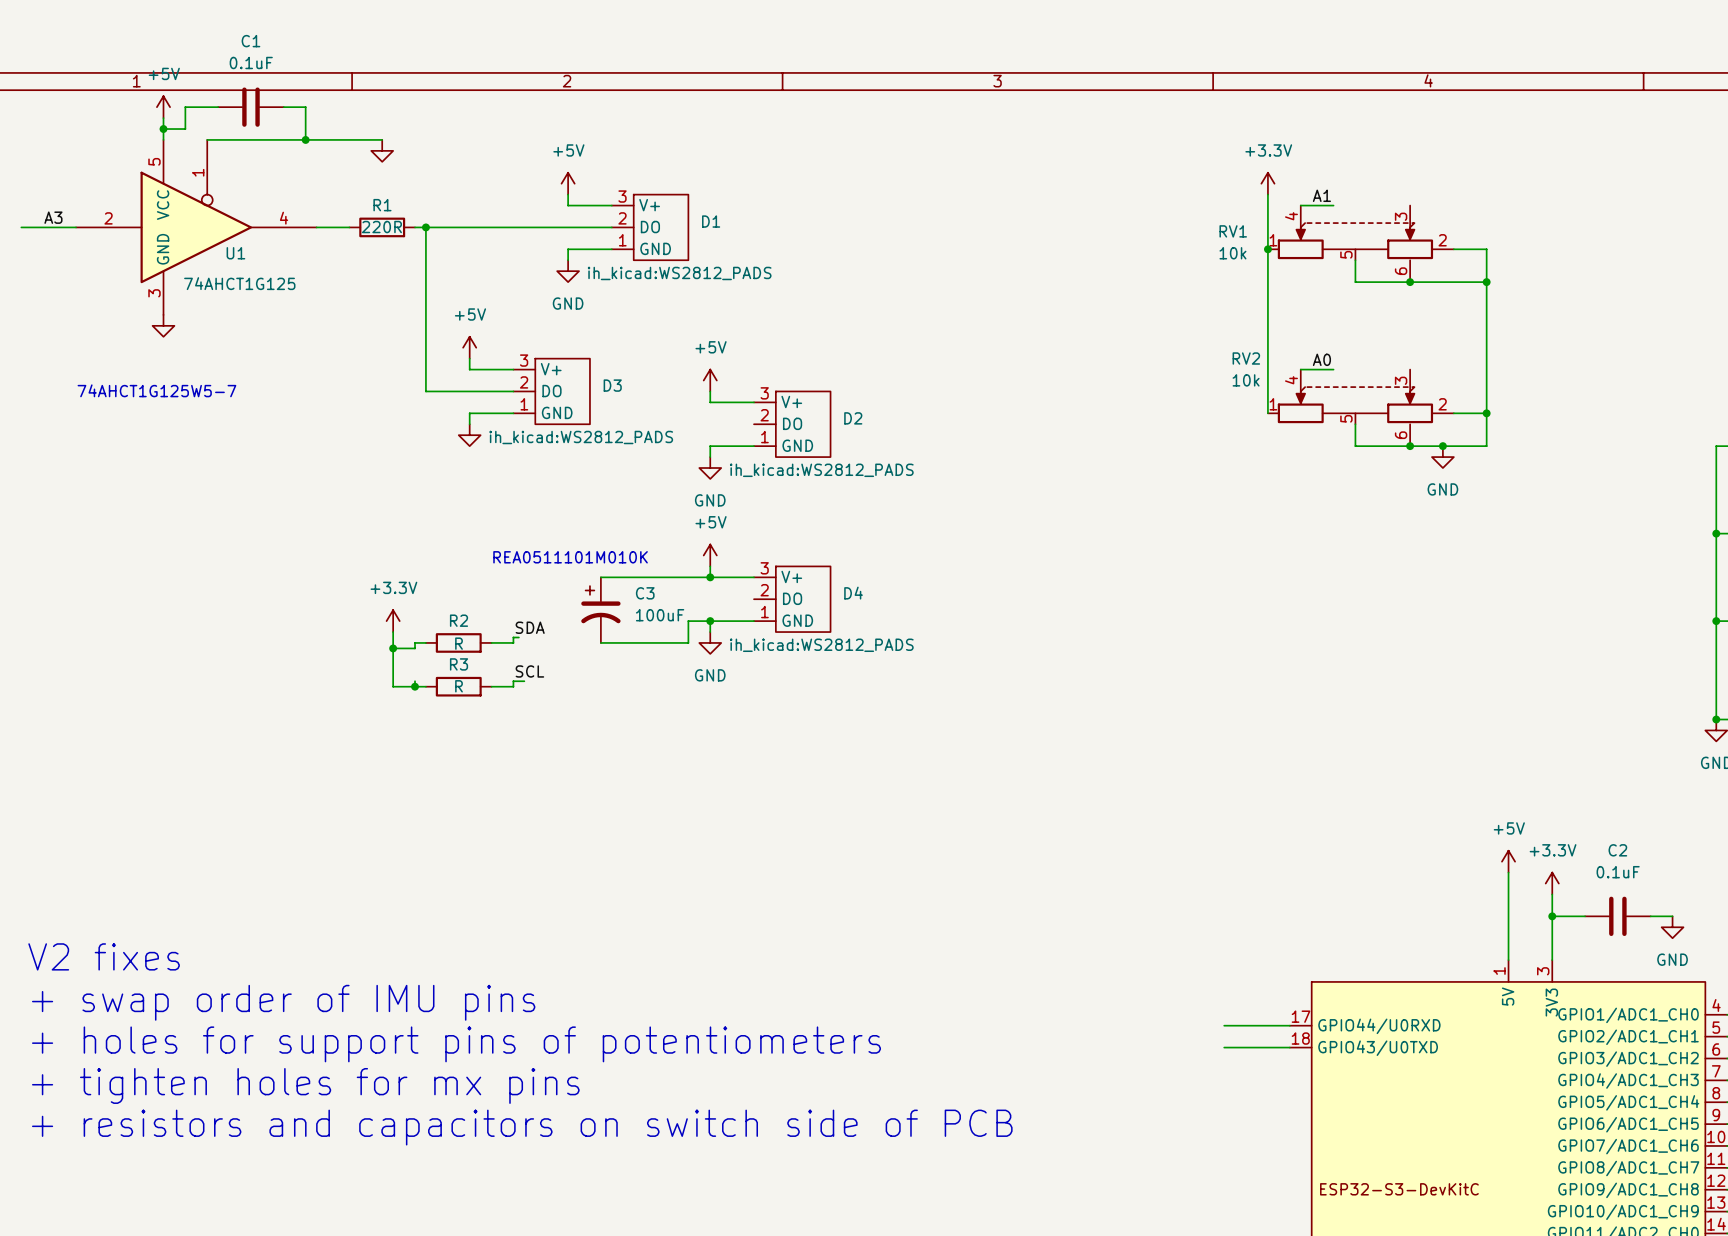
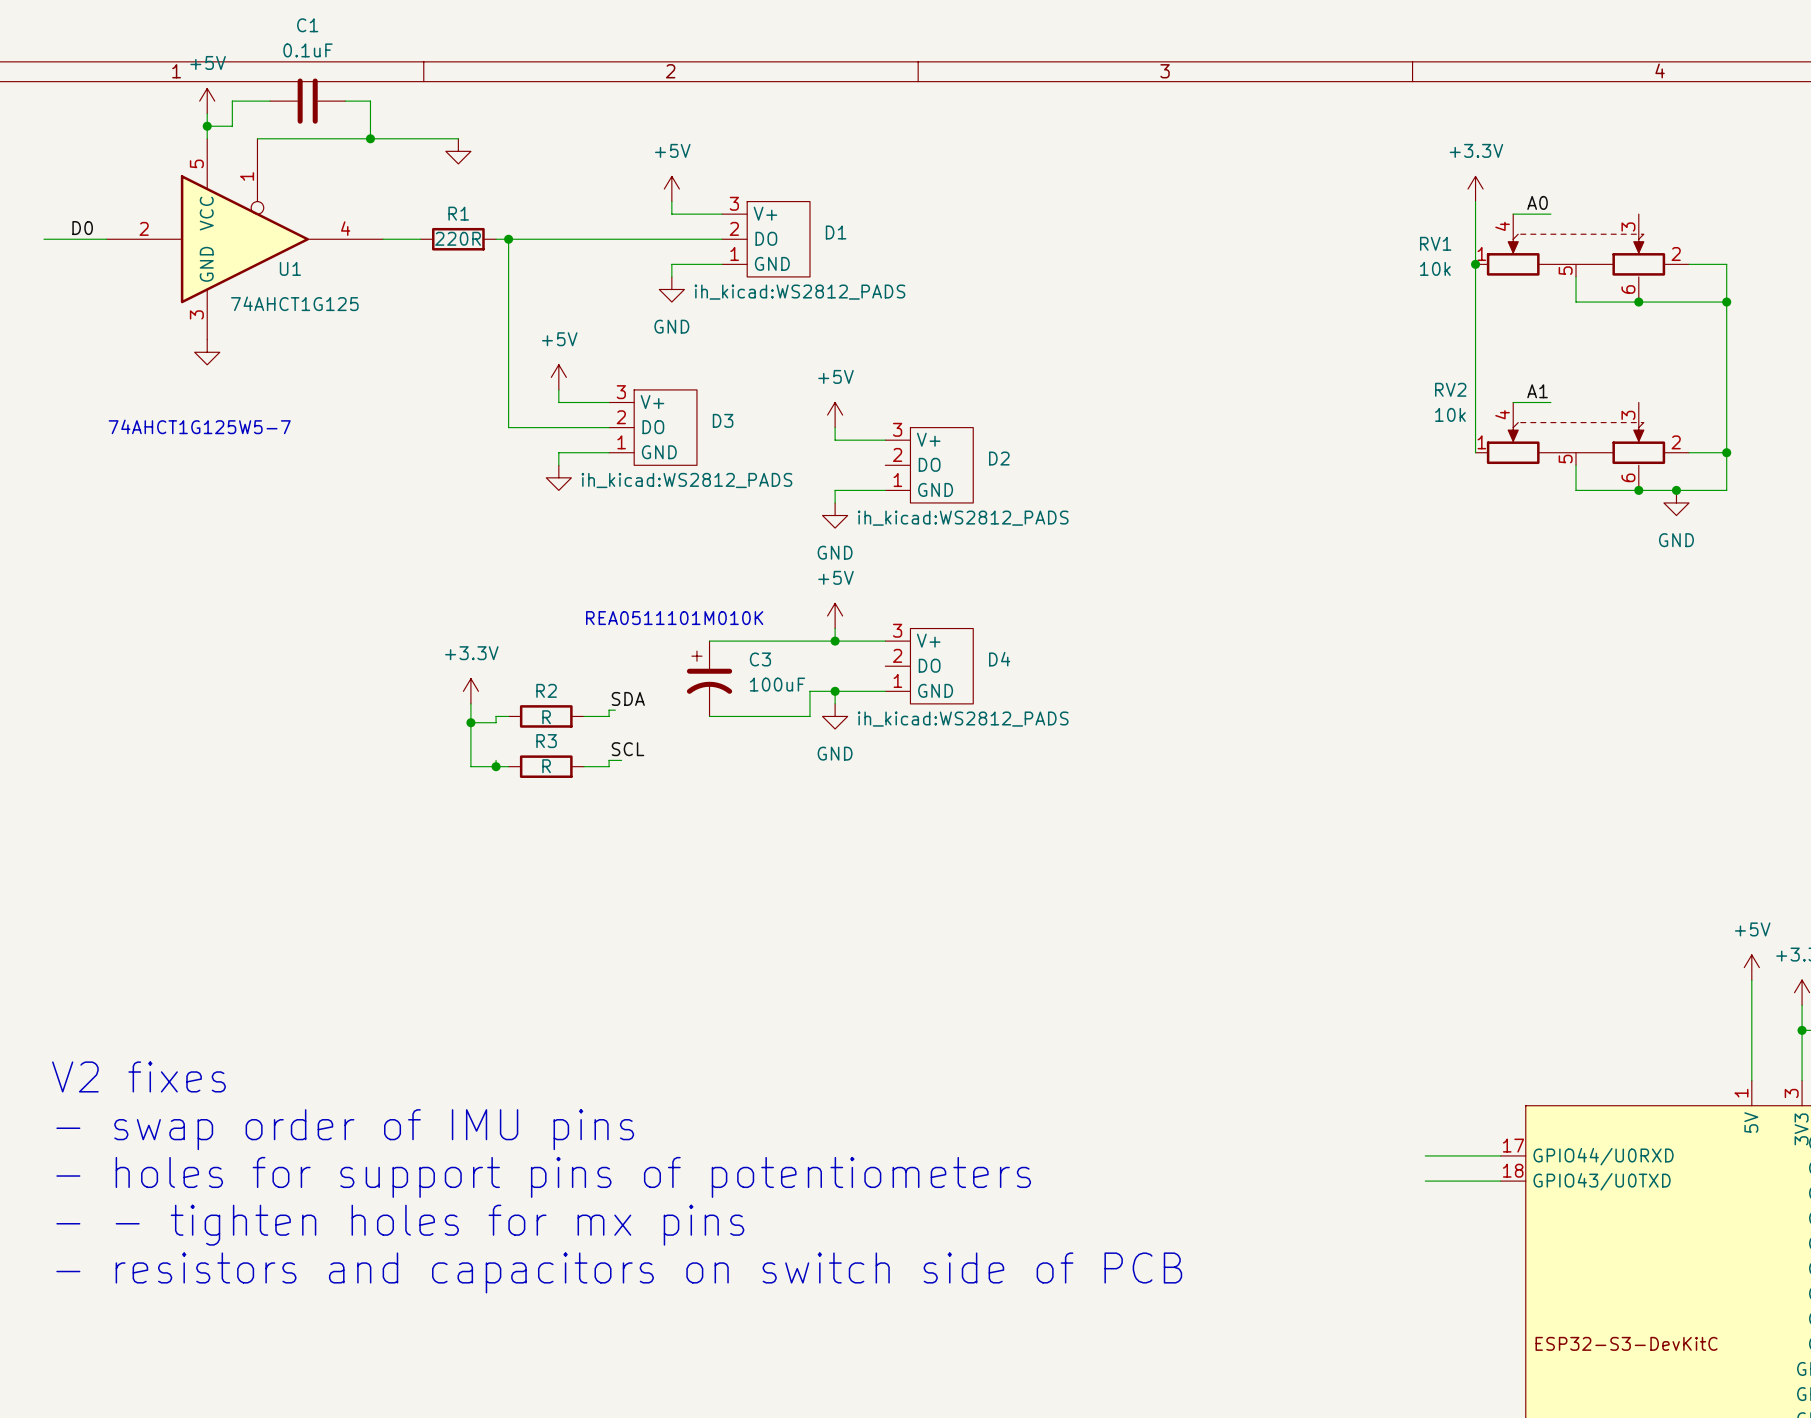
label: A1 (1321, 195) -> A0 (1537, 202)
label: A3 (53, 217) -> D0 (82, 228)
label: A0 (1321, 359) -> A1 (1537, 391)
text: + swap order of IMU pins (283, 1002) -> - swap order of IMU pins (345, 1129)
text: + holes for support pins of potentiometers (456, 1044) -> - holes for support pins of potentiometers (543, 1177)
text: + tighten holes for mx pins (305, 1085) -> - - tighten holes for mx pins (400, 1225)
text: + resistors and capacitors on switch side of PCB (522, 1127) -> - resistors and capacitors on switch side of PCB (619, 1272)

